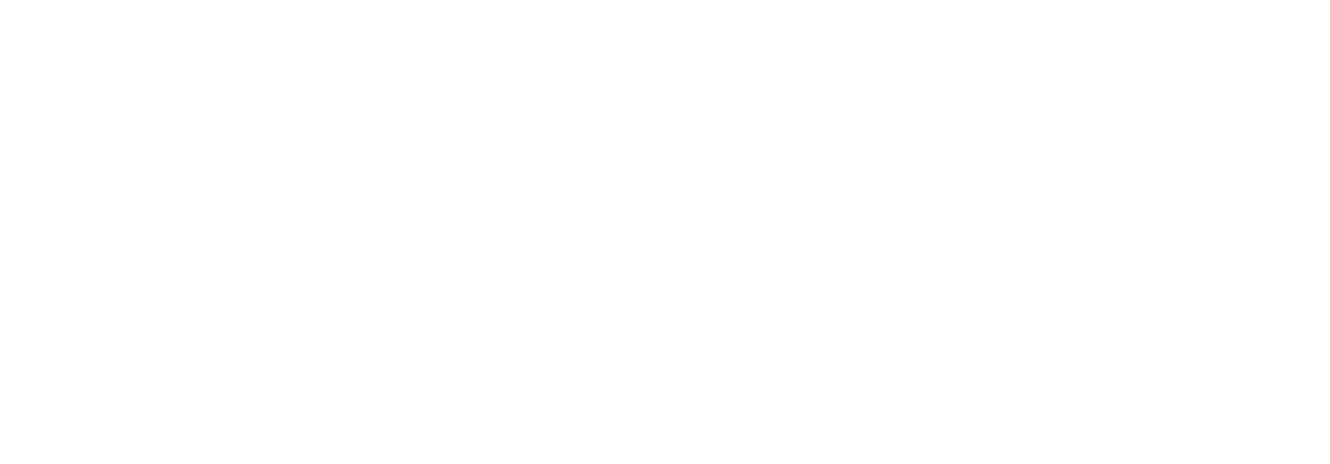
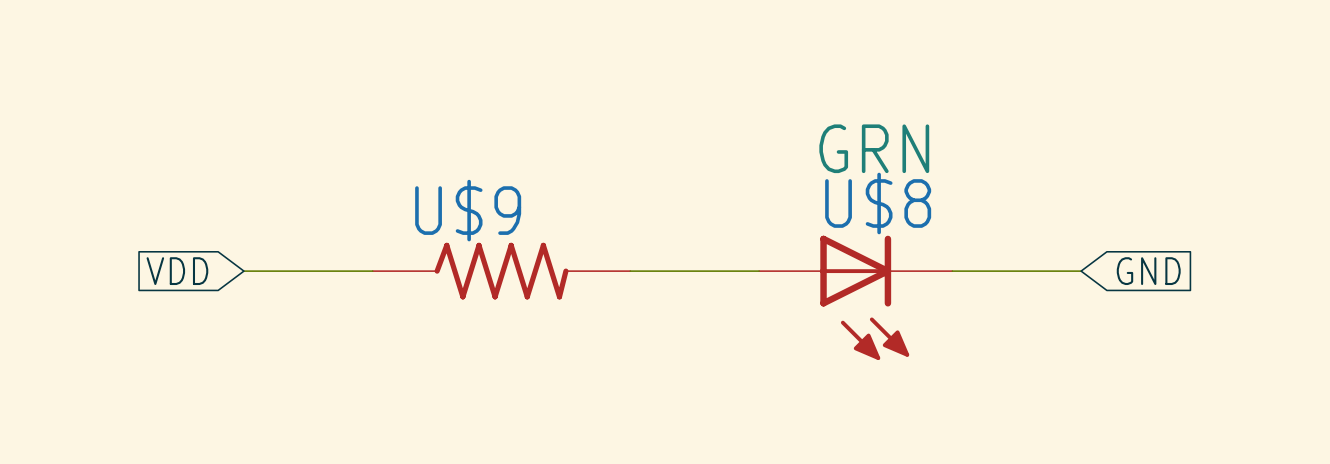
global label: none -> VDD (177, 271)
wire: none -> (243, 271) (372, 271)
U$9: none -> (501, 271)
wire: none -> (630, 271) (759, 271)
wire: none -> (952, 271) (1081, 271)
global label: none -> GND (1148, 271)
U$8: none -> (855, 297)

